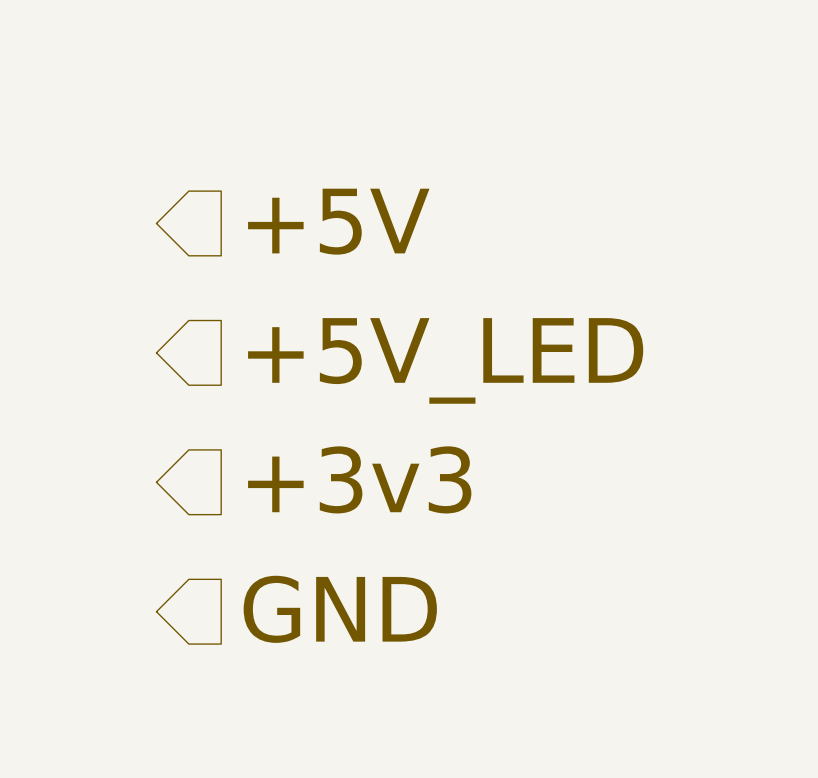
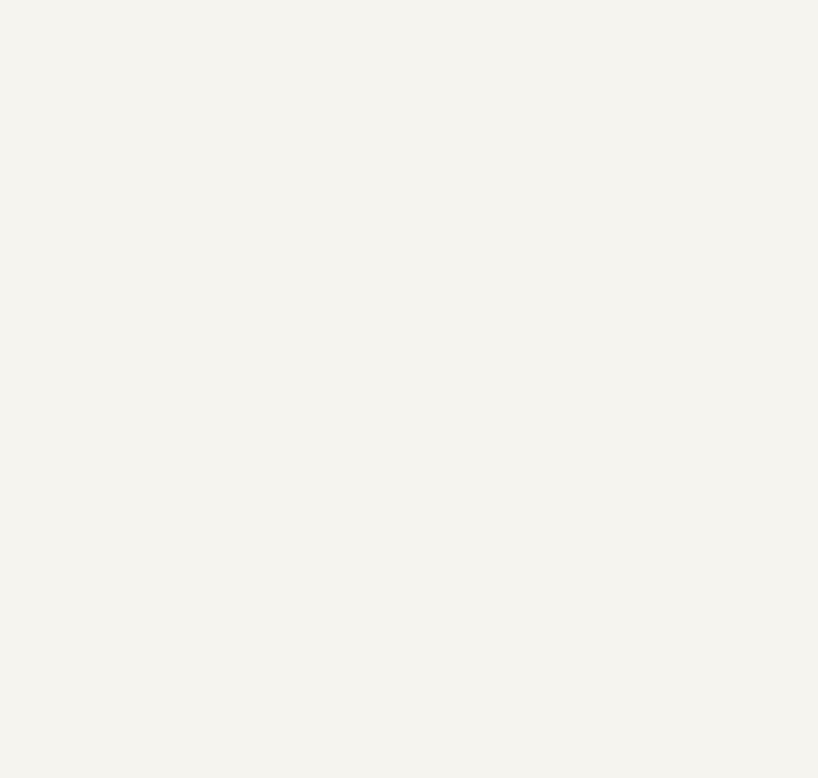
hierarchical label: +5V (338, 221) -> none
hierarchical label: +5V_LED (445, 360) -> none
hierarchical label: +3v3 (359, 479) -> none
hierarchical label: GND (340, 609) -> none

